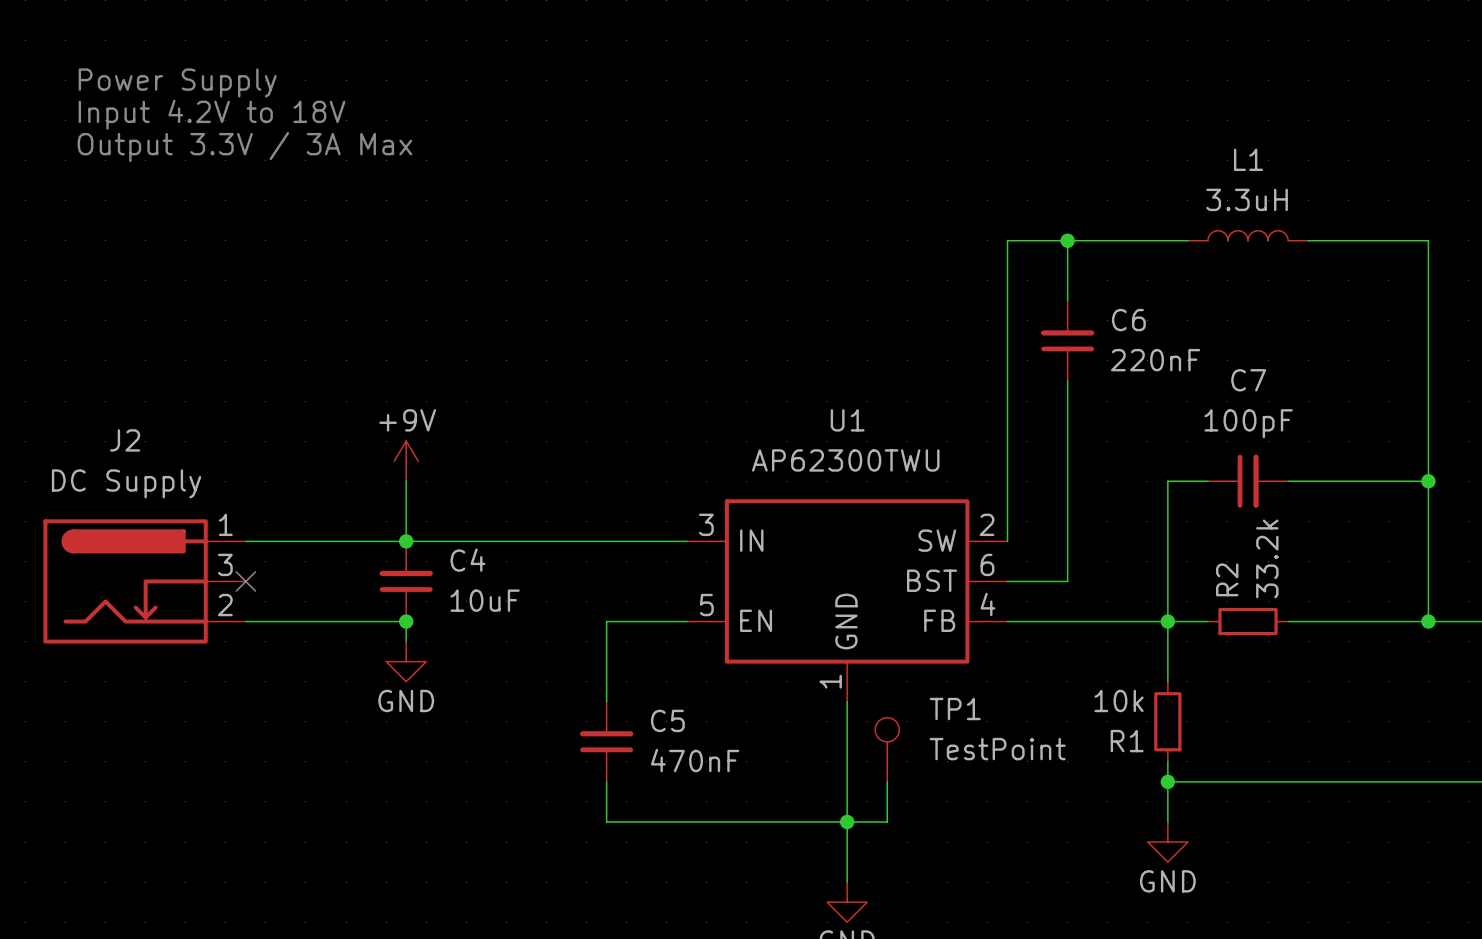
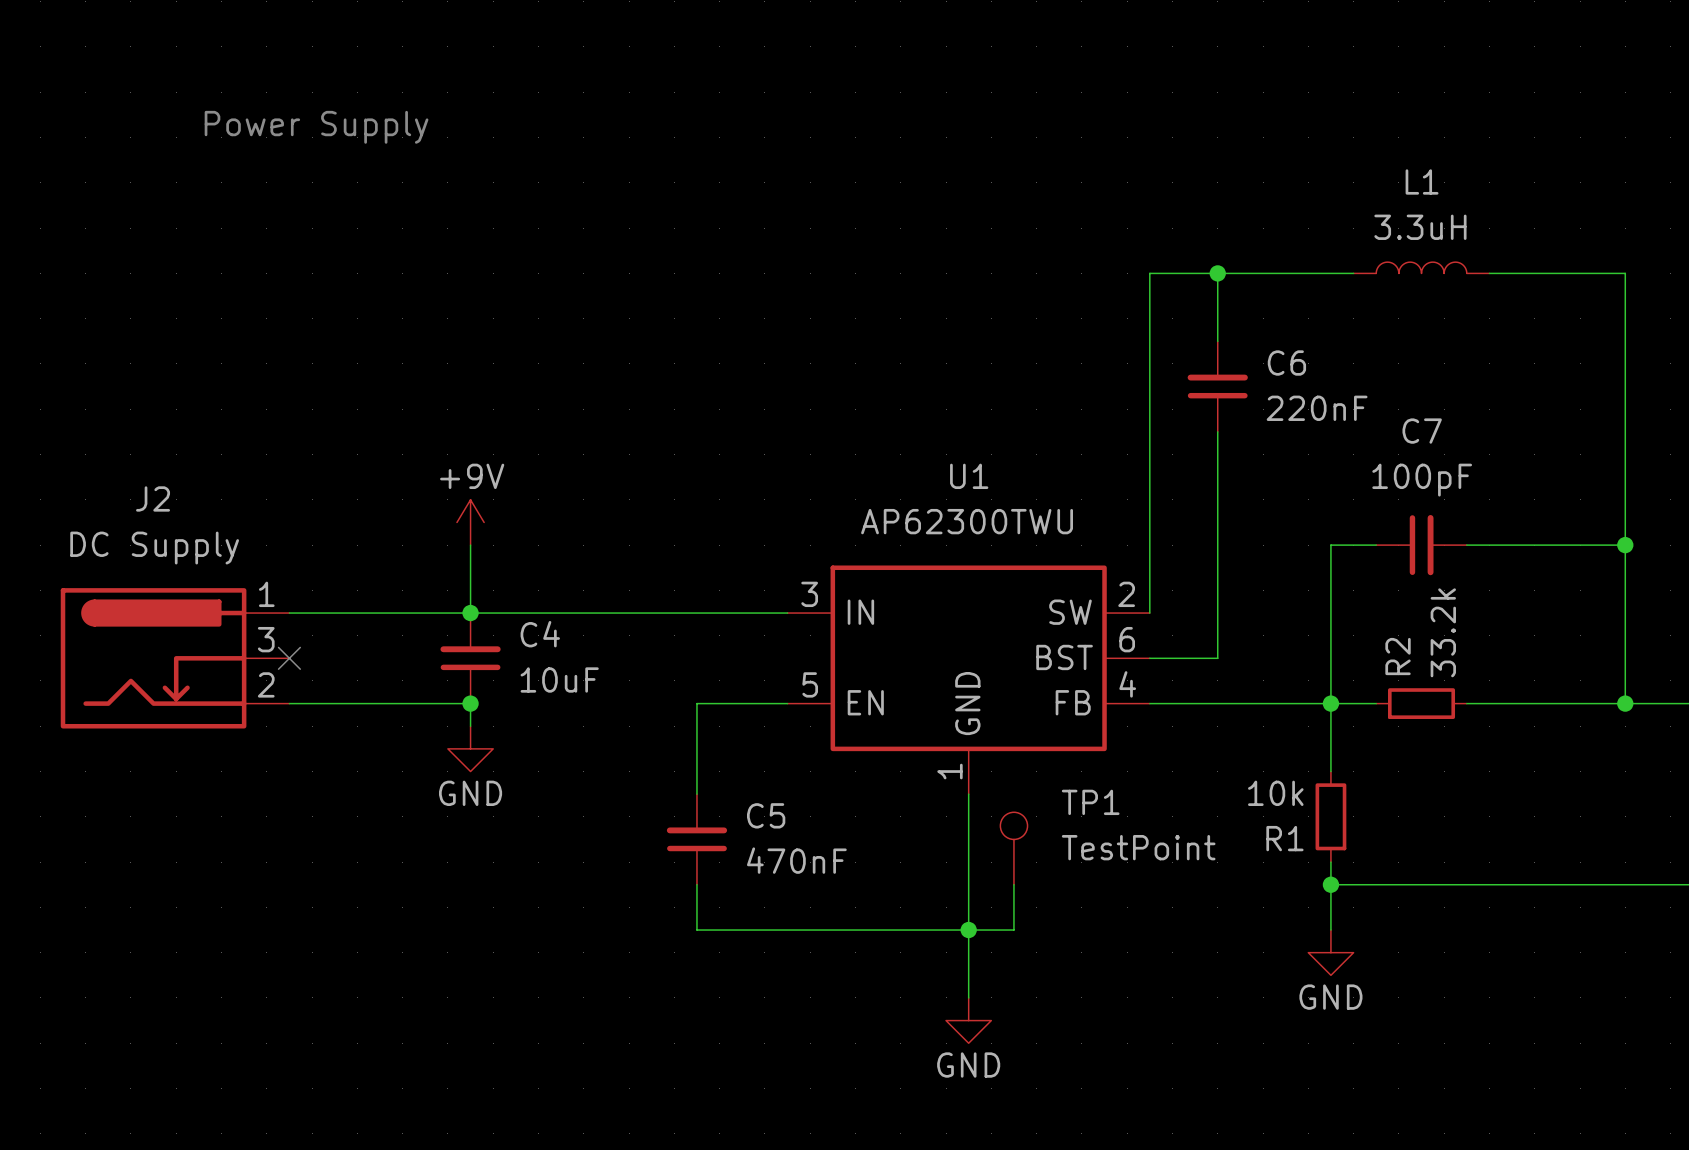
text position: Power Supply (177, 82) -> Power Supply (316, 127)
text: Input 4.2V to 18V (212, 114) -> none
text: Output 3.3V / 3A Max (244, 147) -> none

